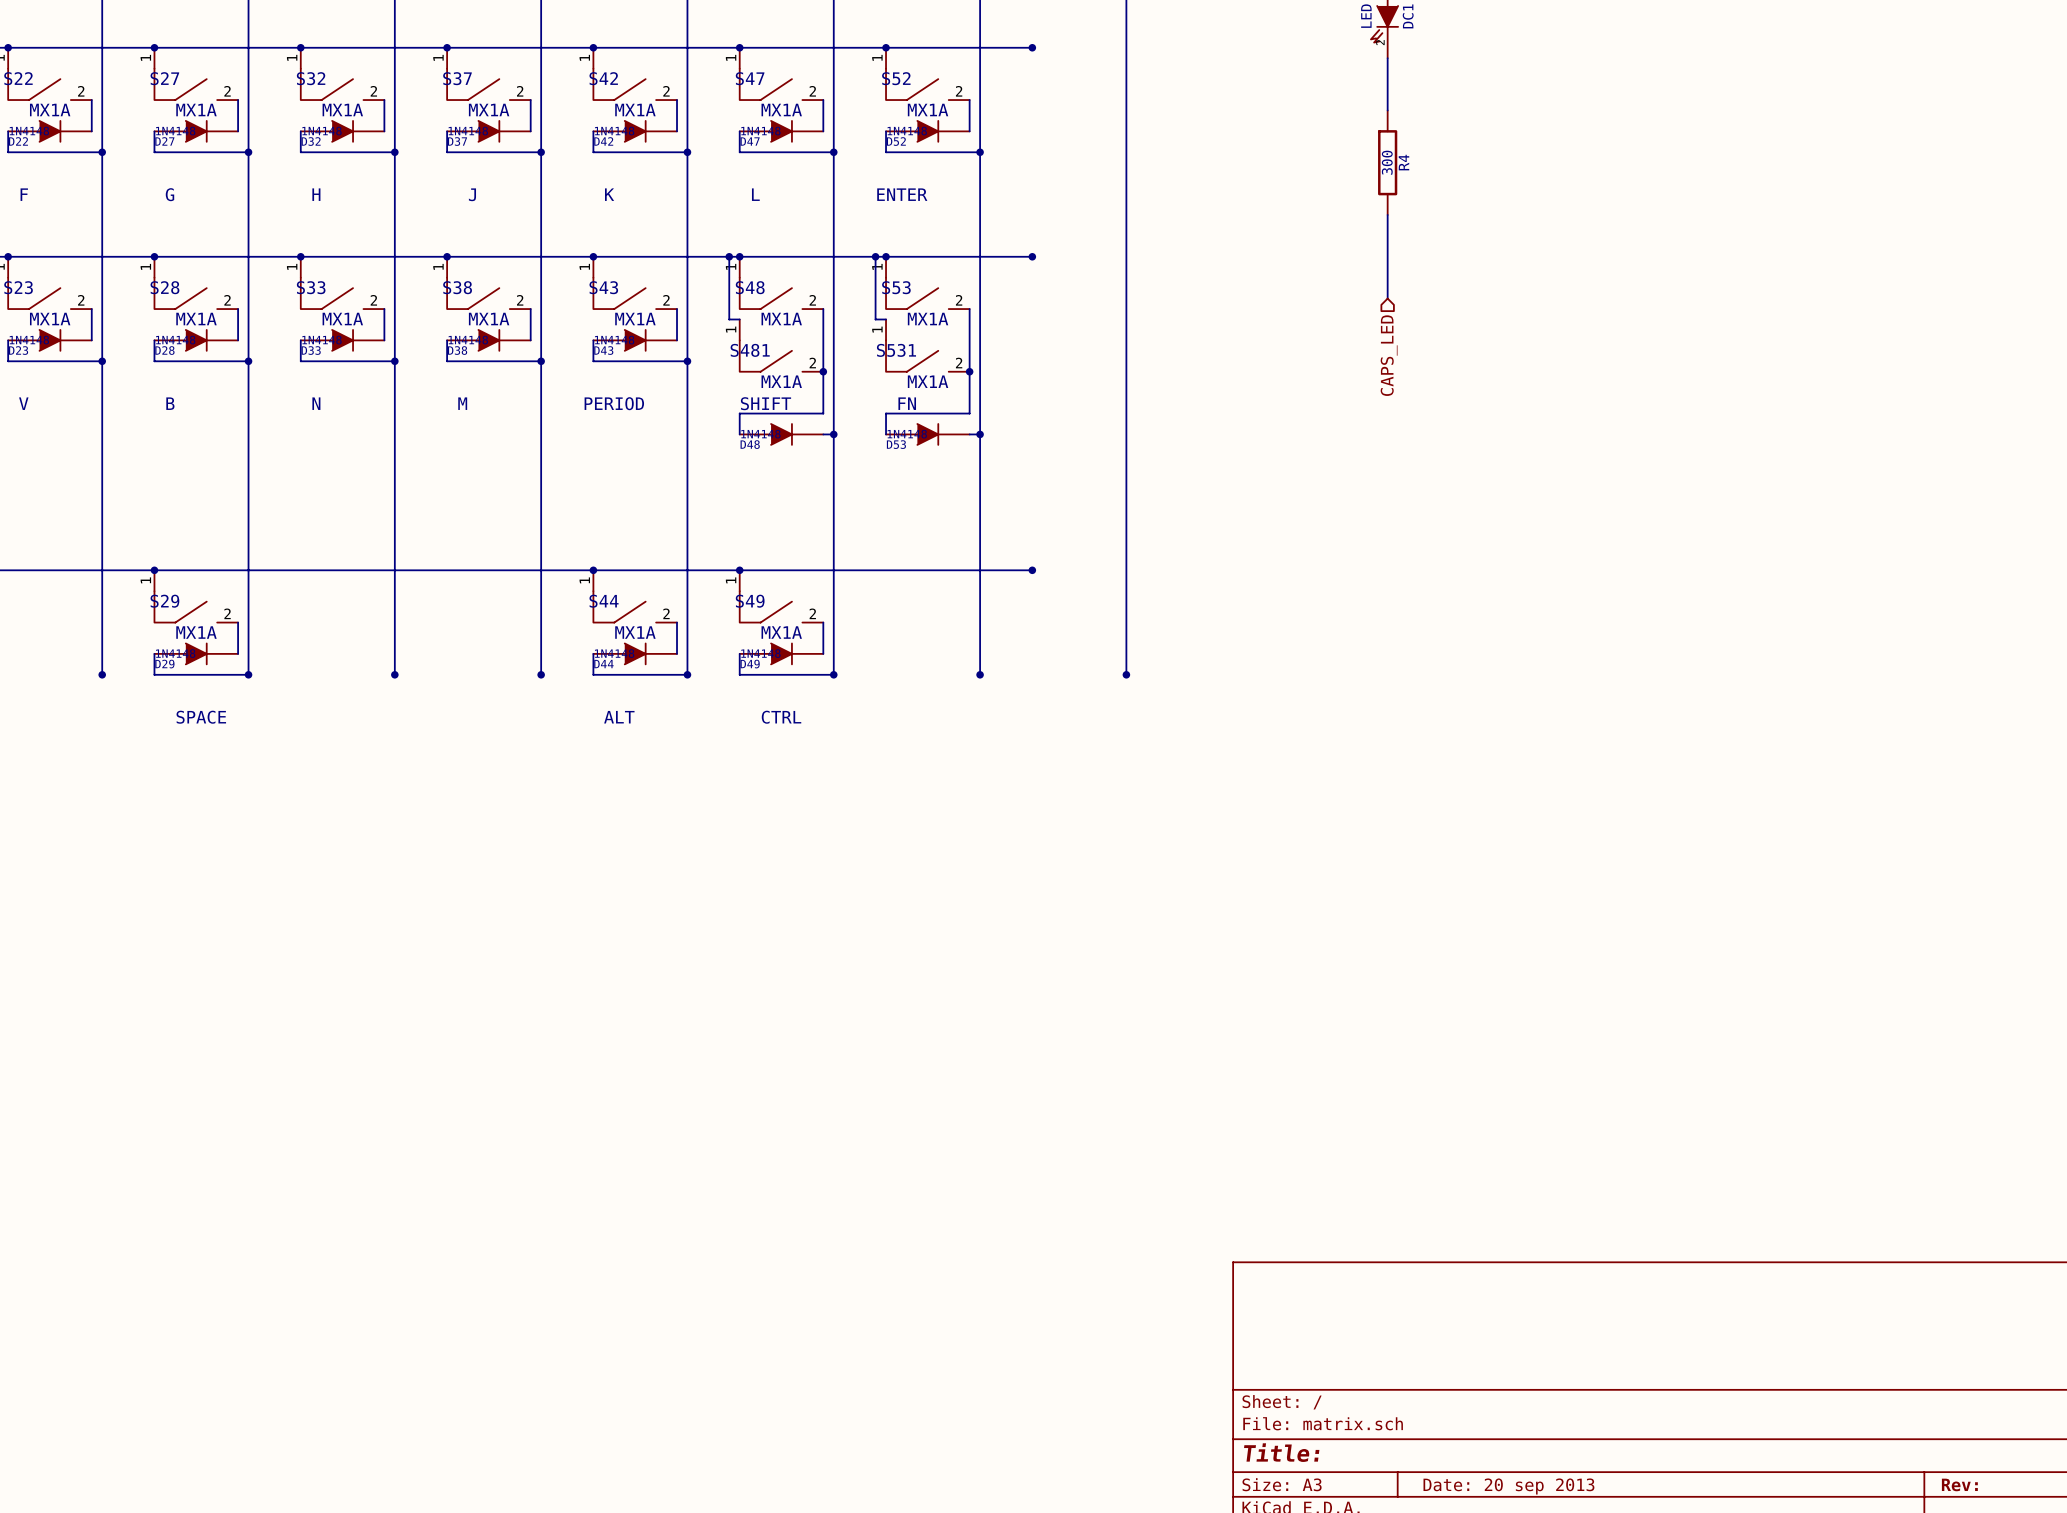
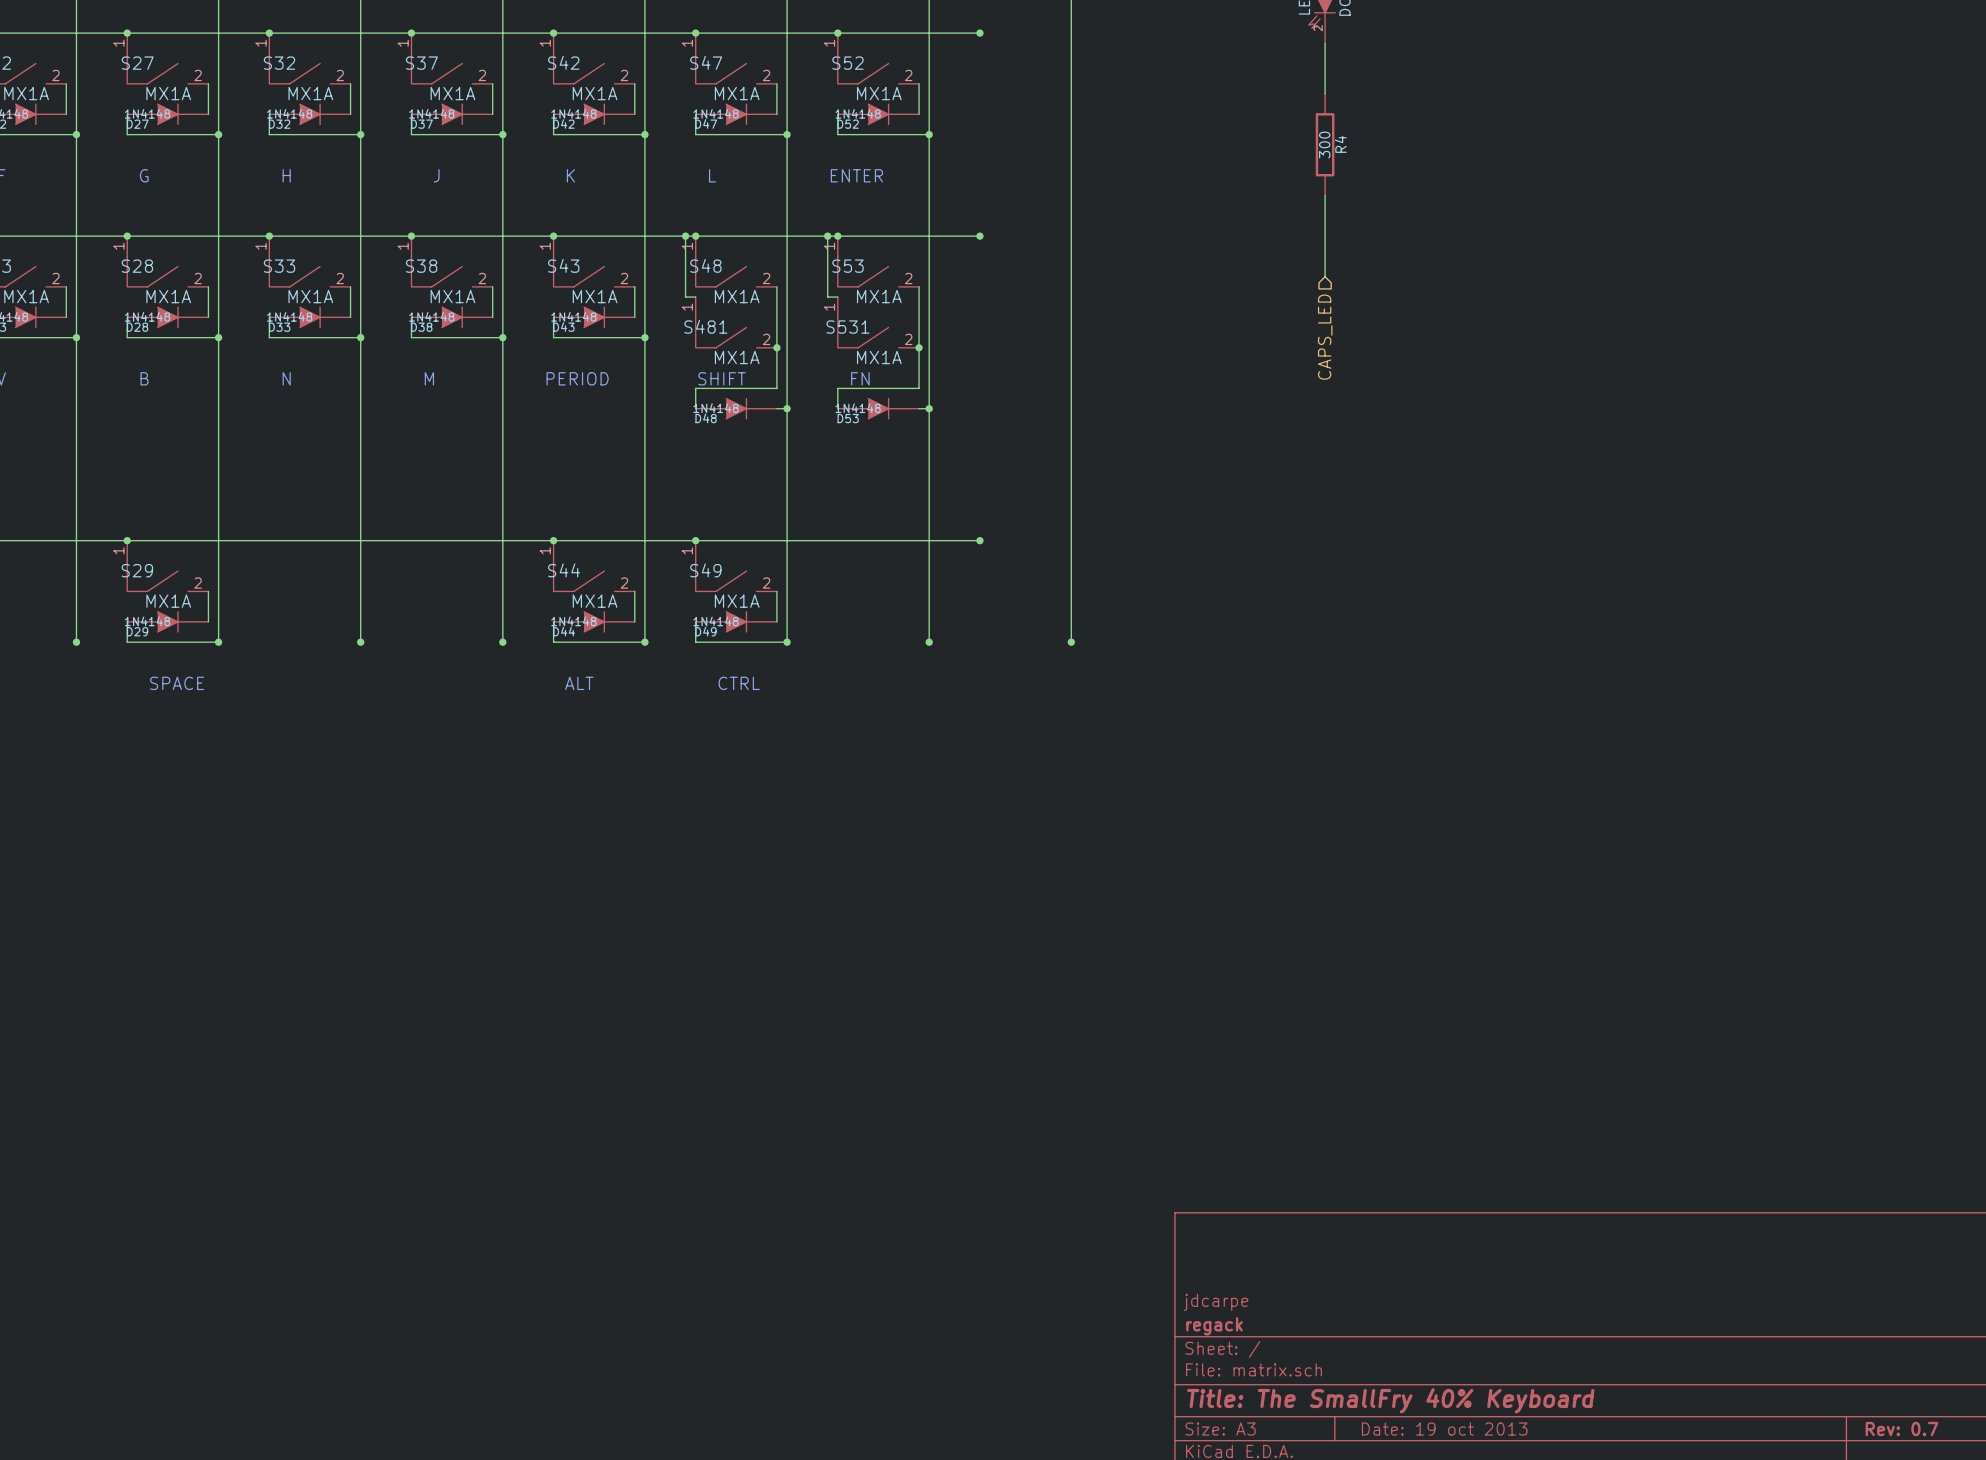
title block: none -> jdcarpe (1216, 1302)
title block: none -> regack (1214, 1326)
title block: Title: (1281, 1452) -> Title: The SmallFry 40% Keyboard (1390, 1400)
title block: Rev: (1959, 1484) -> Rev: 0.7 (1901, 1429)
title block: Date: 20 sep 2013 (1508, 1486) -> Date: 19 oct 2013 (1444, 1429)

